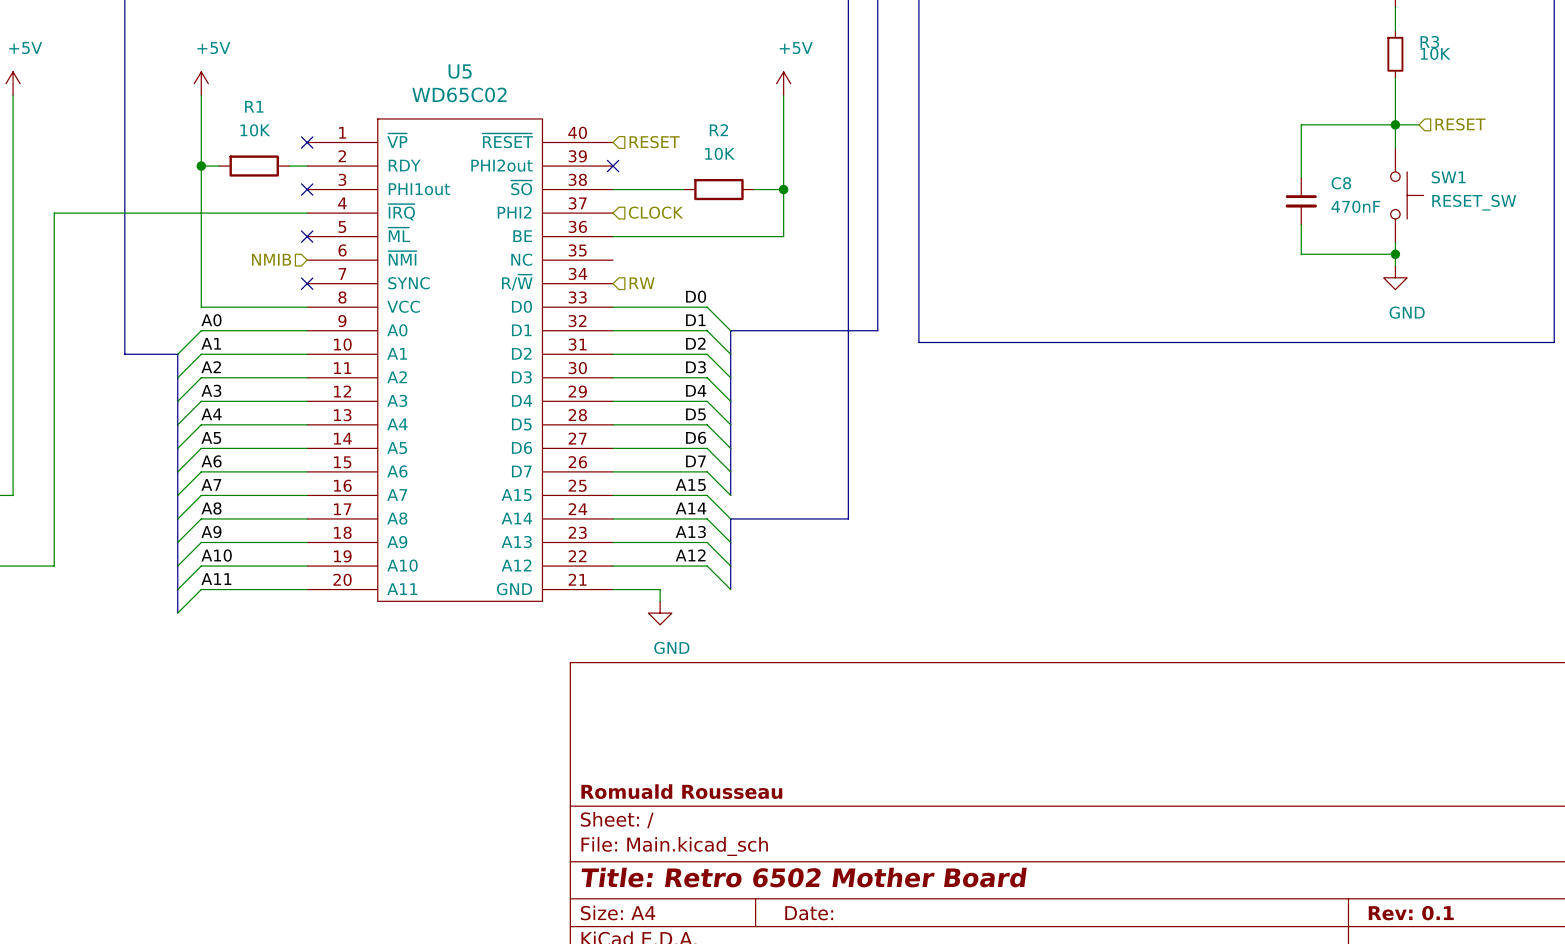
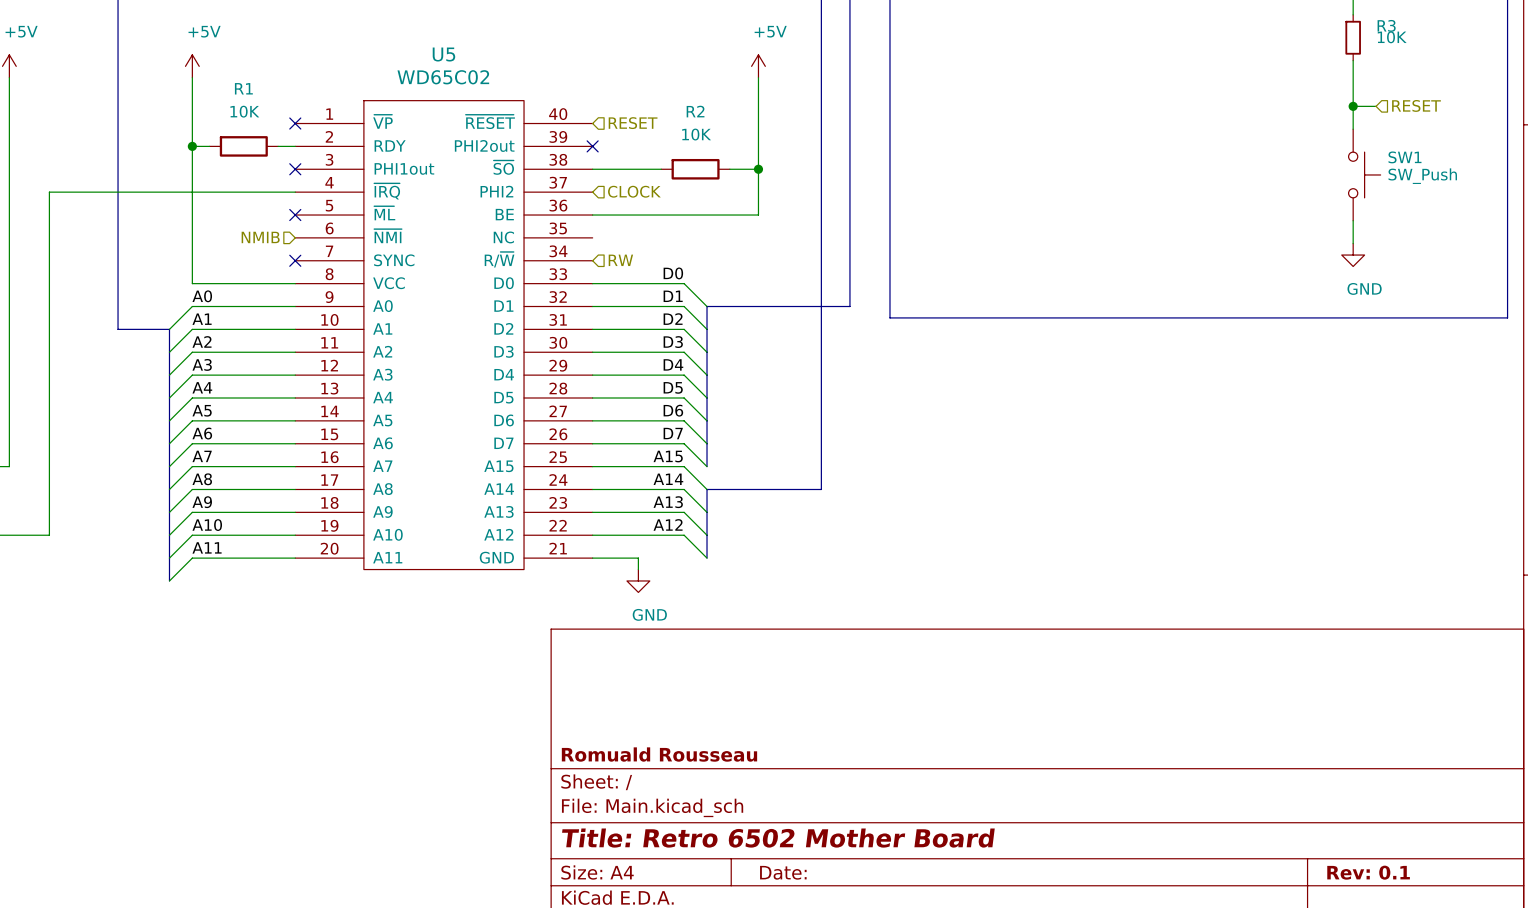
wire: (1395, 124) (1301, 124) (1301, 177) -> none
C8: 470nF (1301, 201) -> none
SW1 value: RESET_SW (1474, 202) -> SW_Push (1422, 176)
wire: (1301, 224) (1301, 254) (1395, 254) -> none
junction: (1395, 254) -> none

